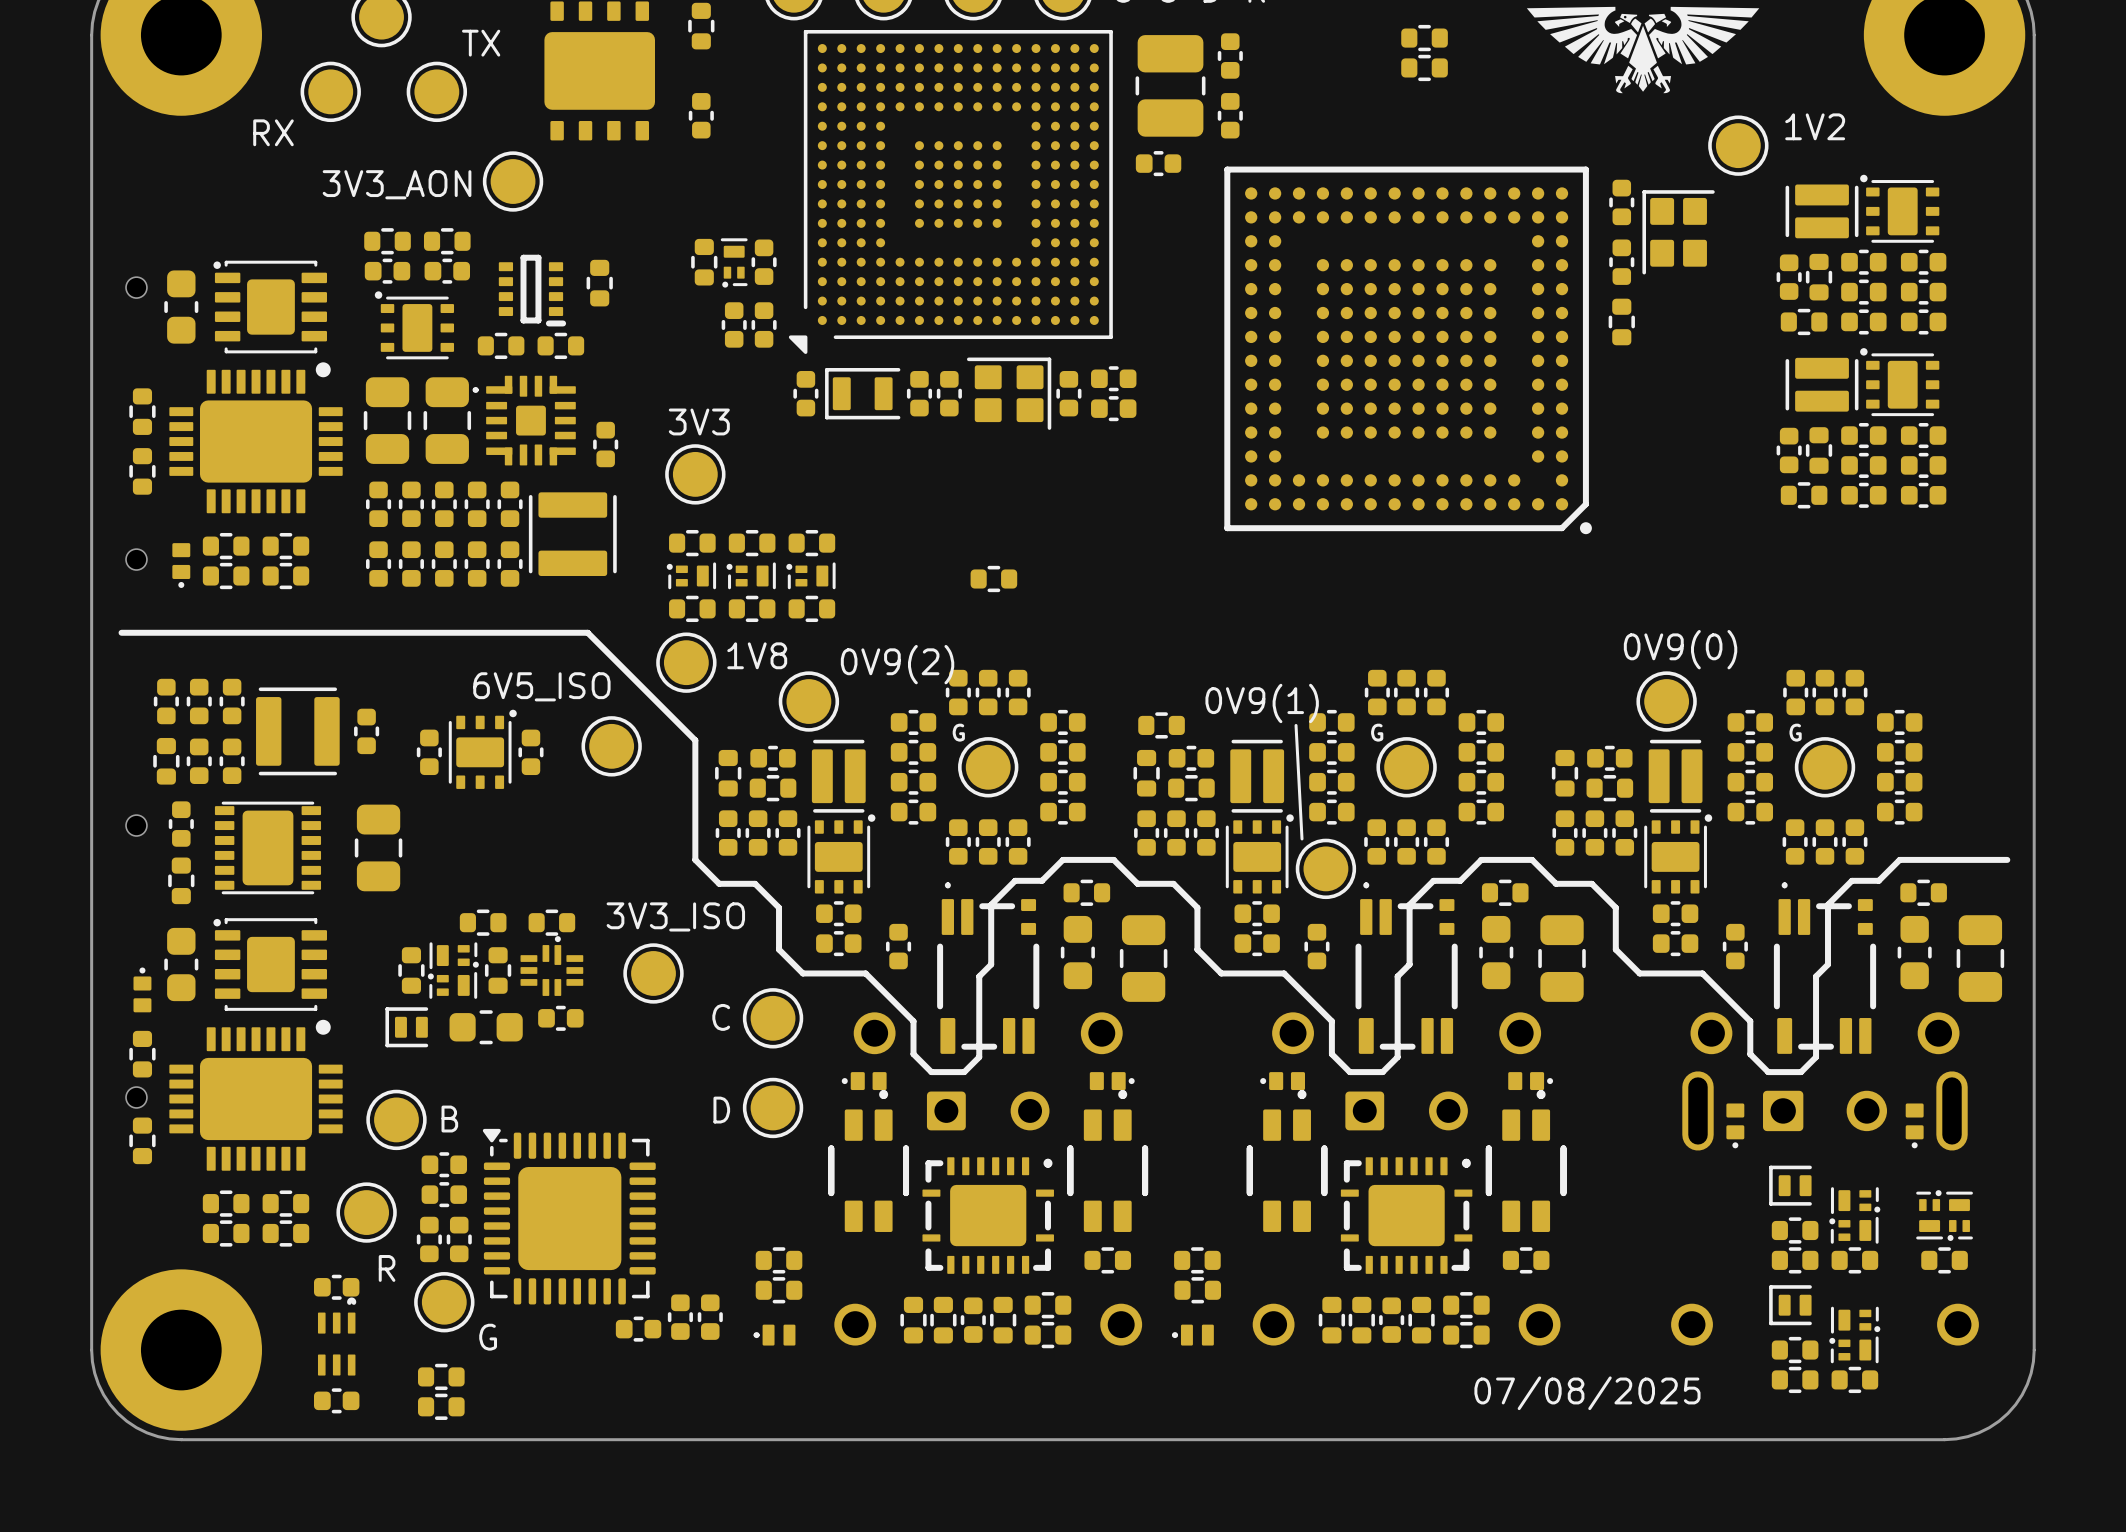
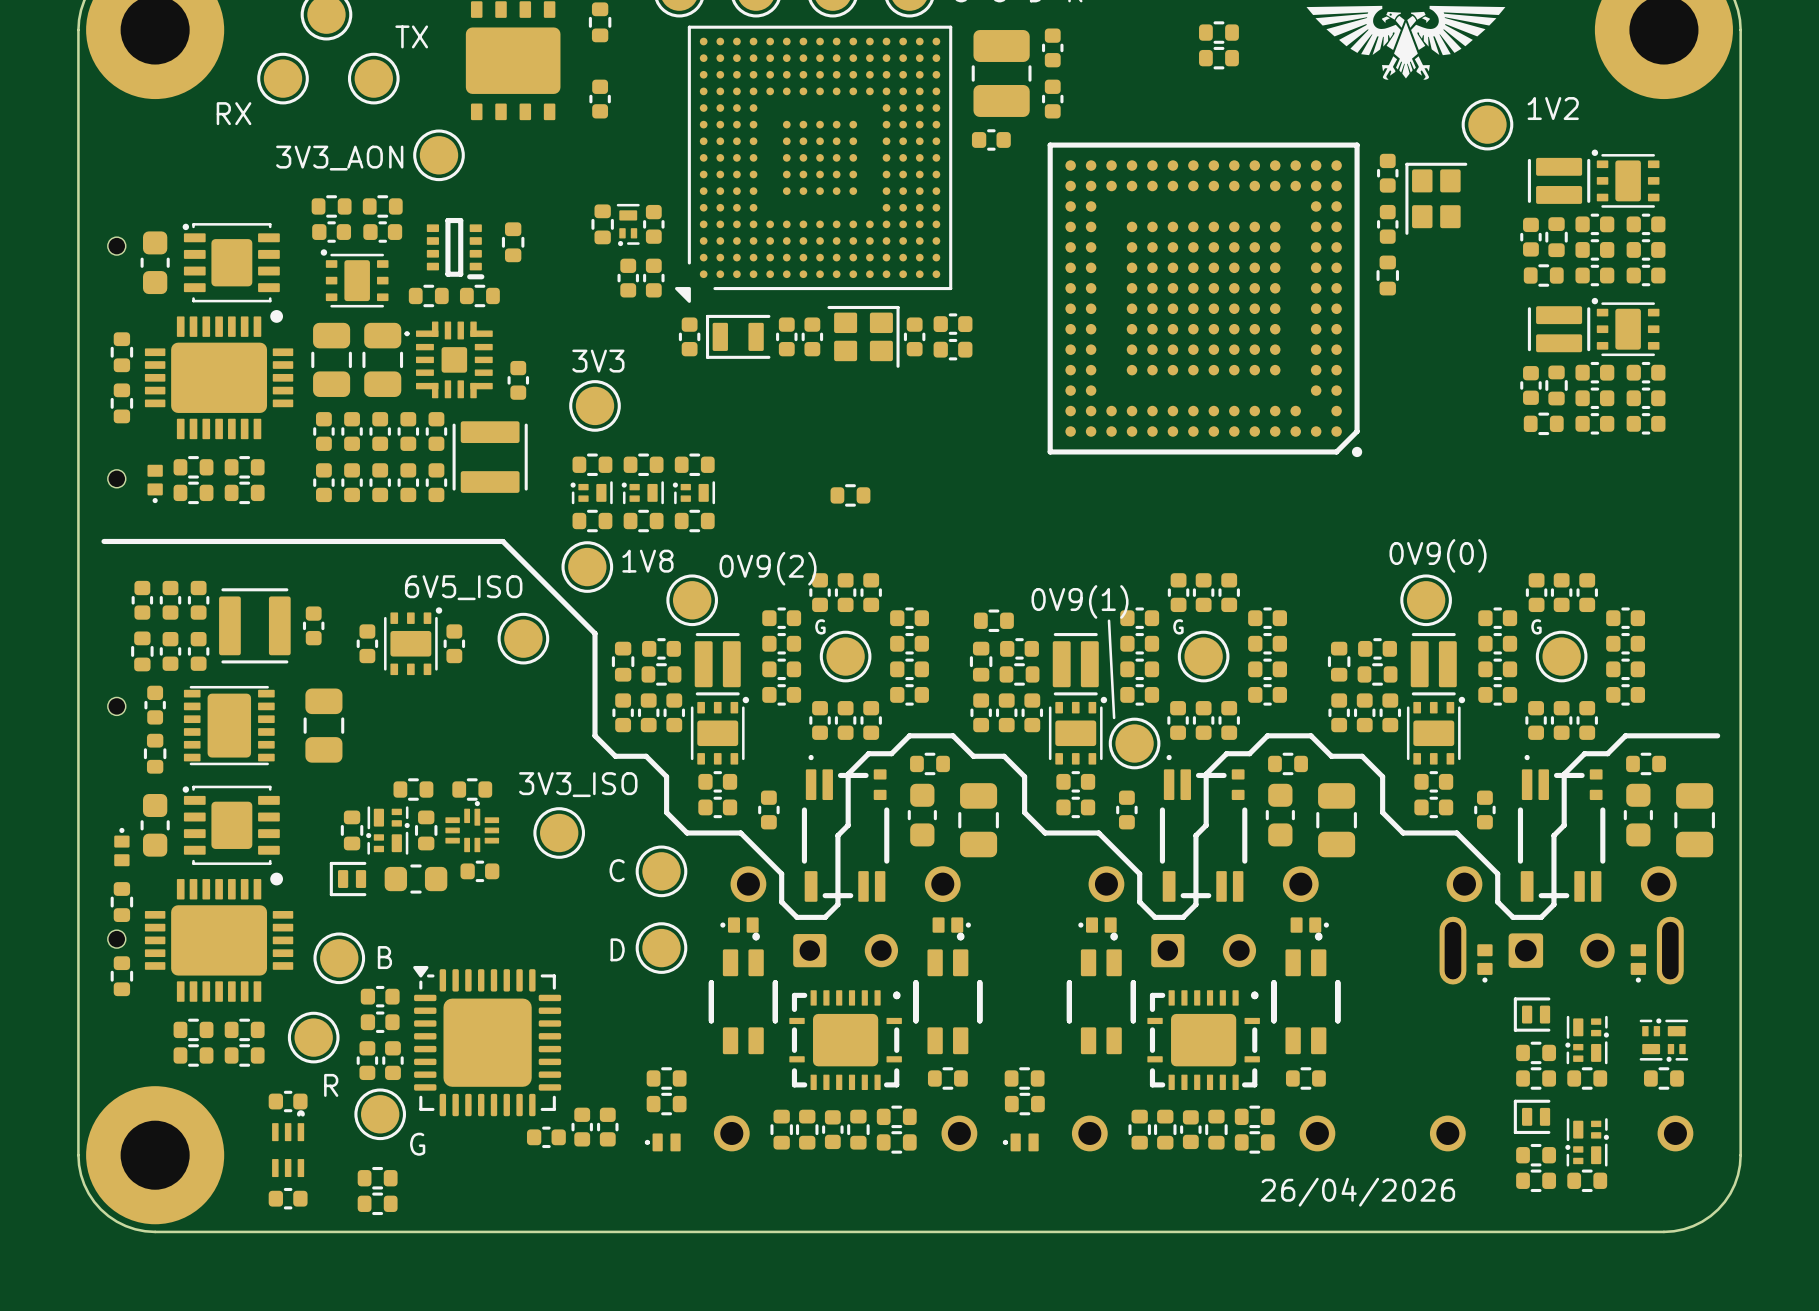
text: 07/08/2025 (1587, 1393) -> 26/04/2026 (1357, 1192)

